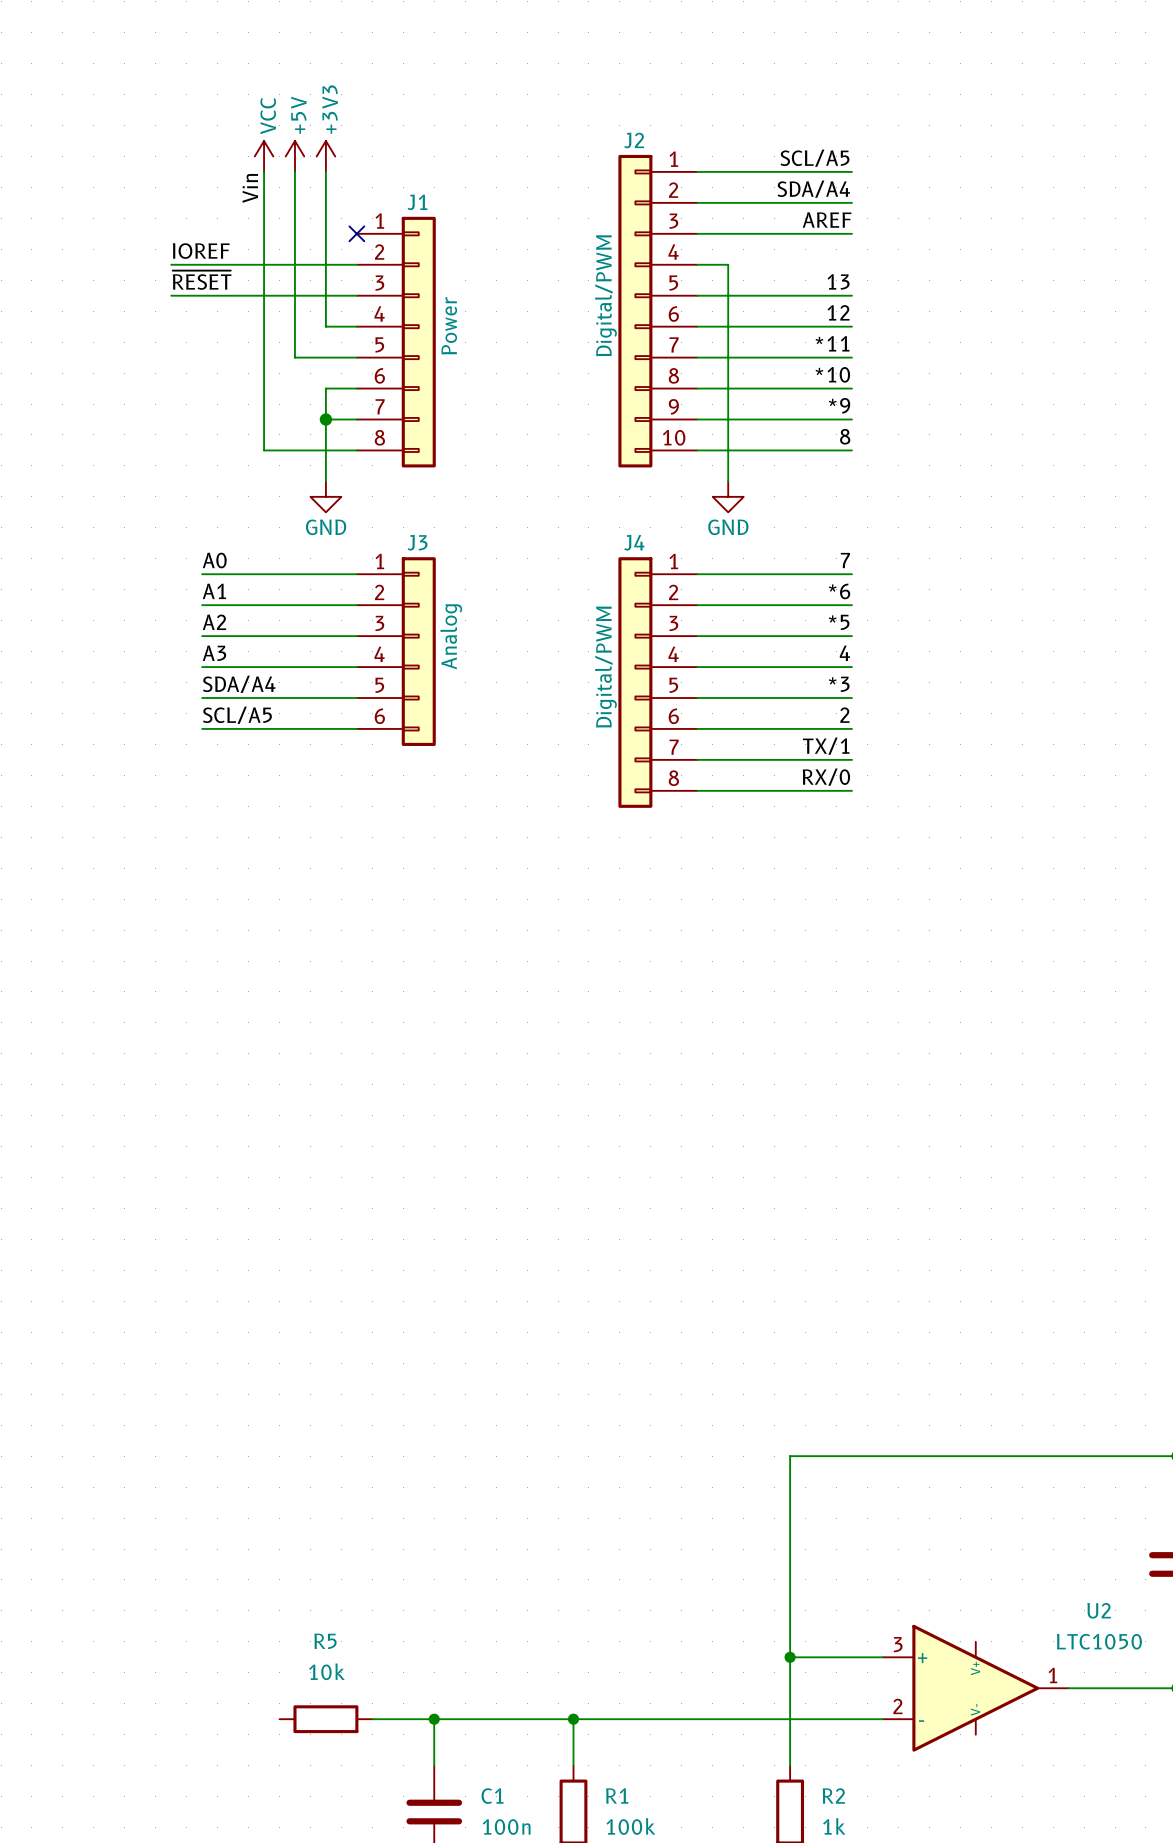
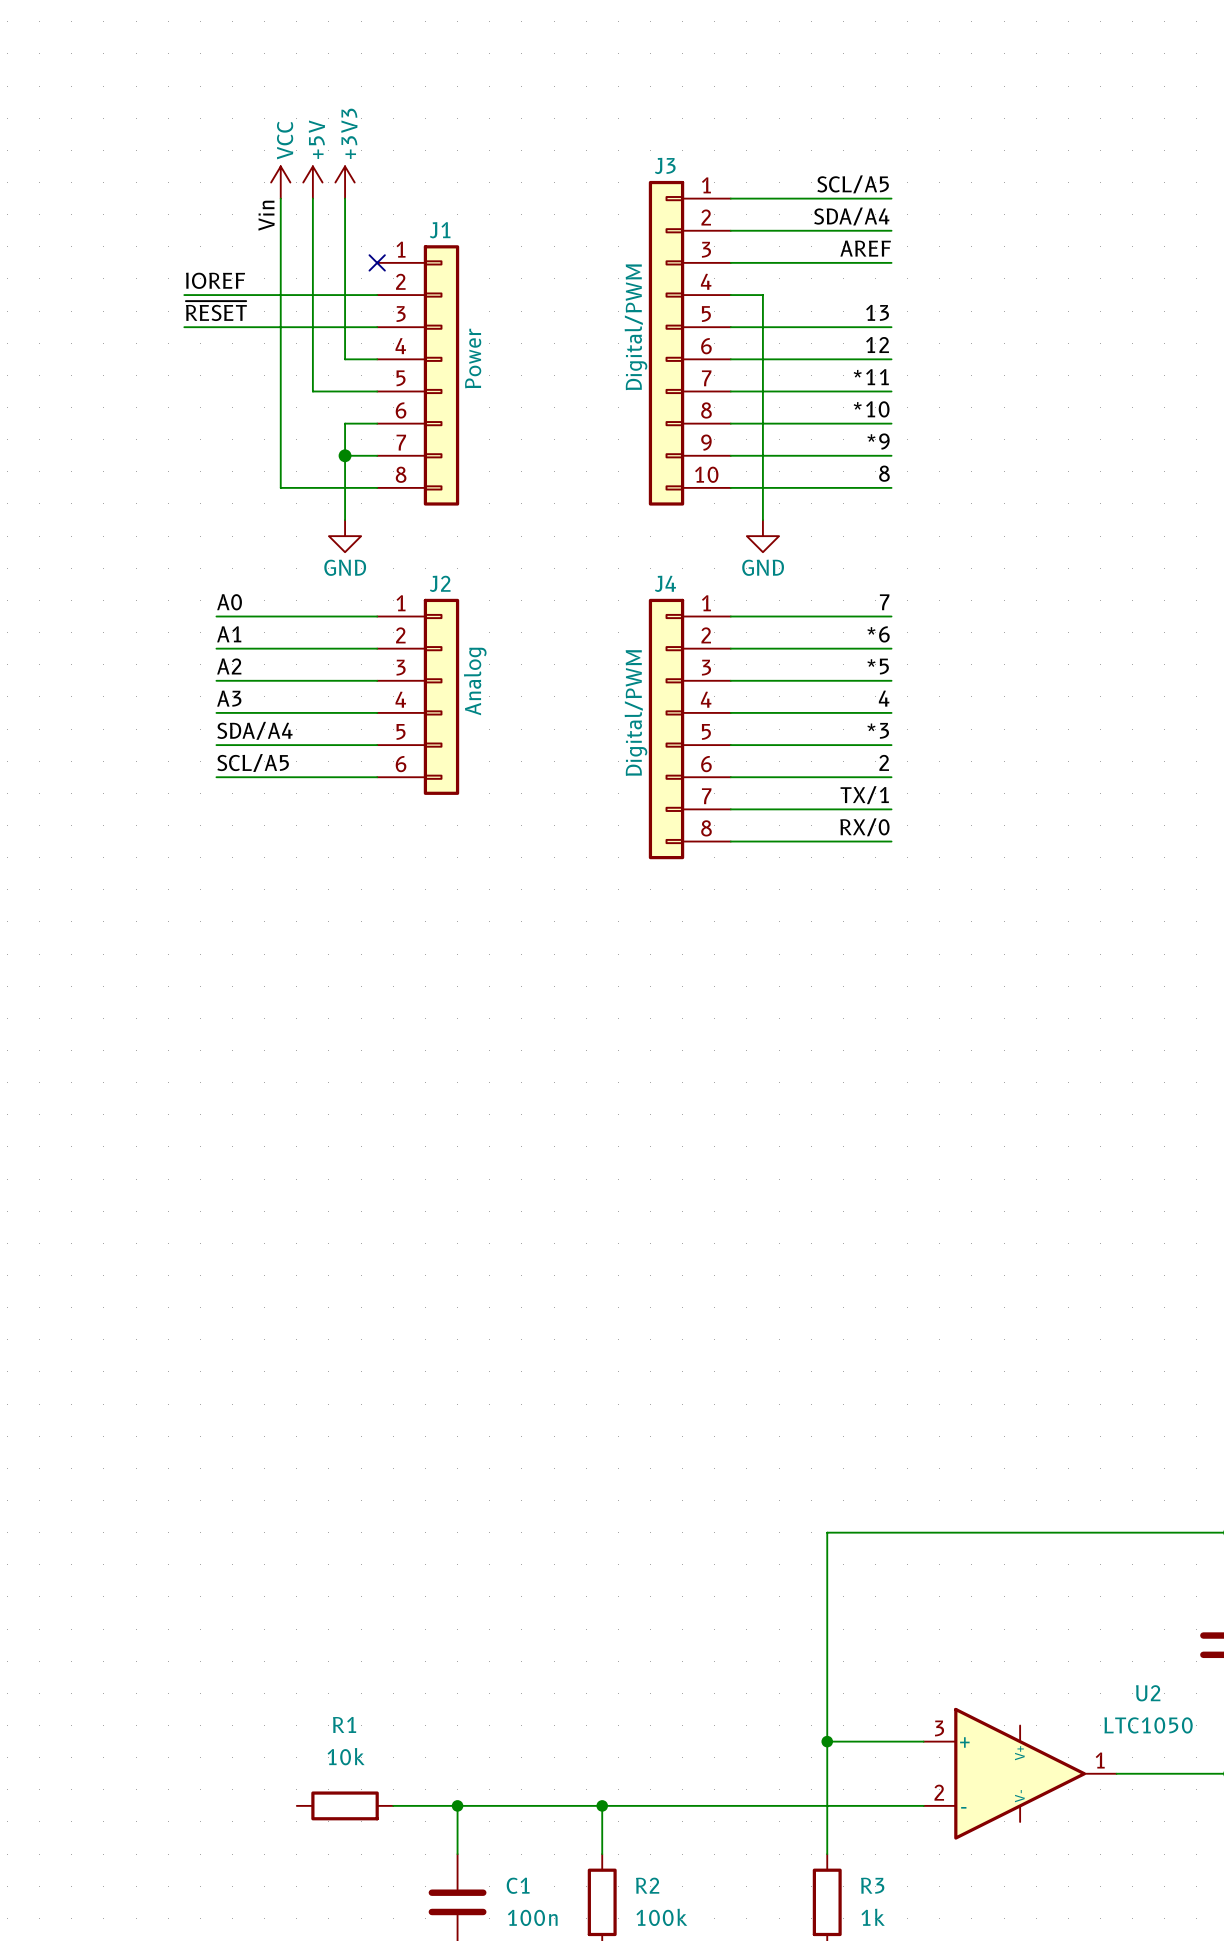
J2 name: J2 (634, 140) -> J3 (665, 165)
J3 name: J3 (417, 542) -> J2 (440, 583)
R5 name: R5 (325, 1641) -> R1 (344, 1724)
R1 name: R1 (617, 1795) -> R2 (647, 1885)
R2 name: R2 (833, 1796) -> R3 (872, 1885)

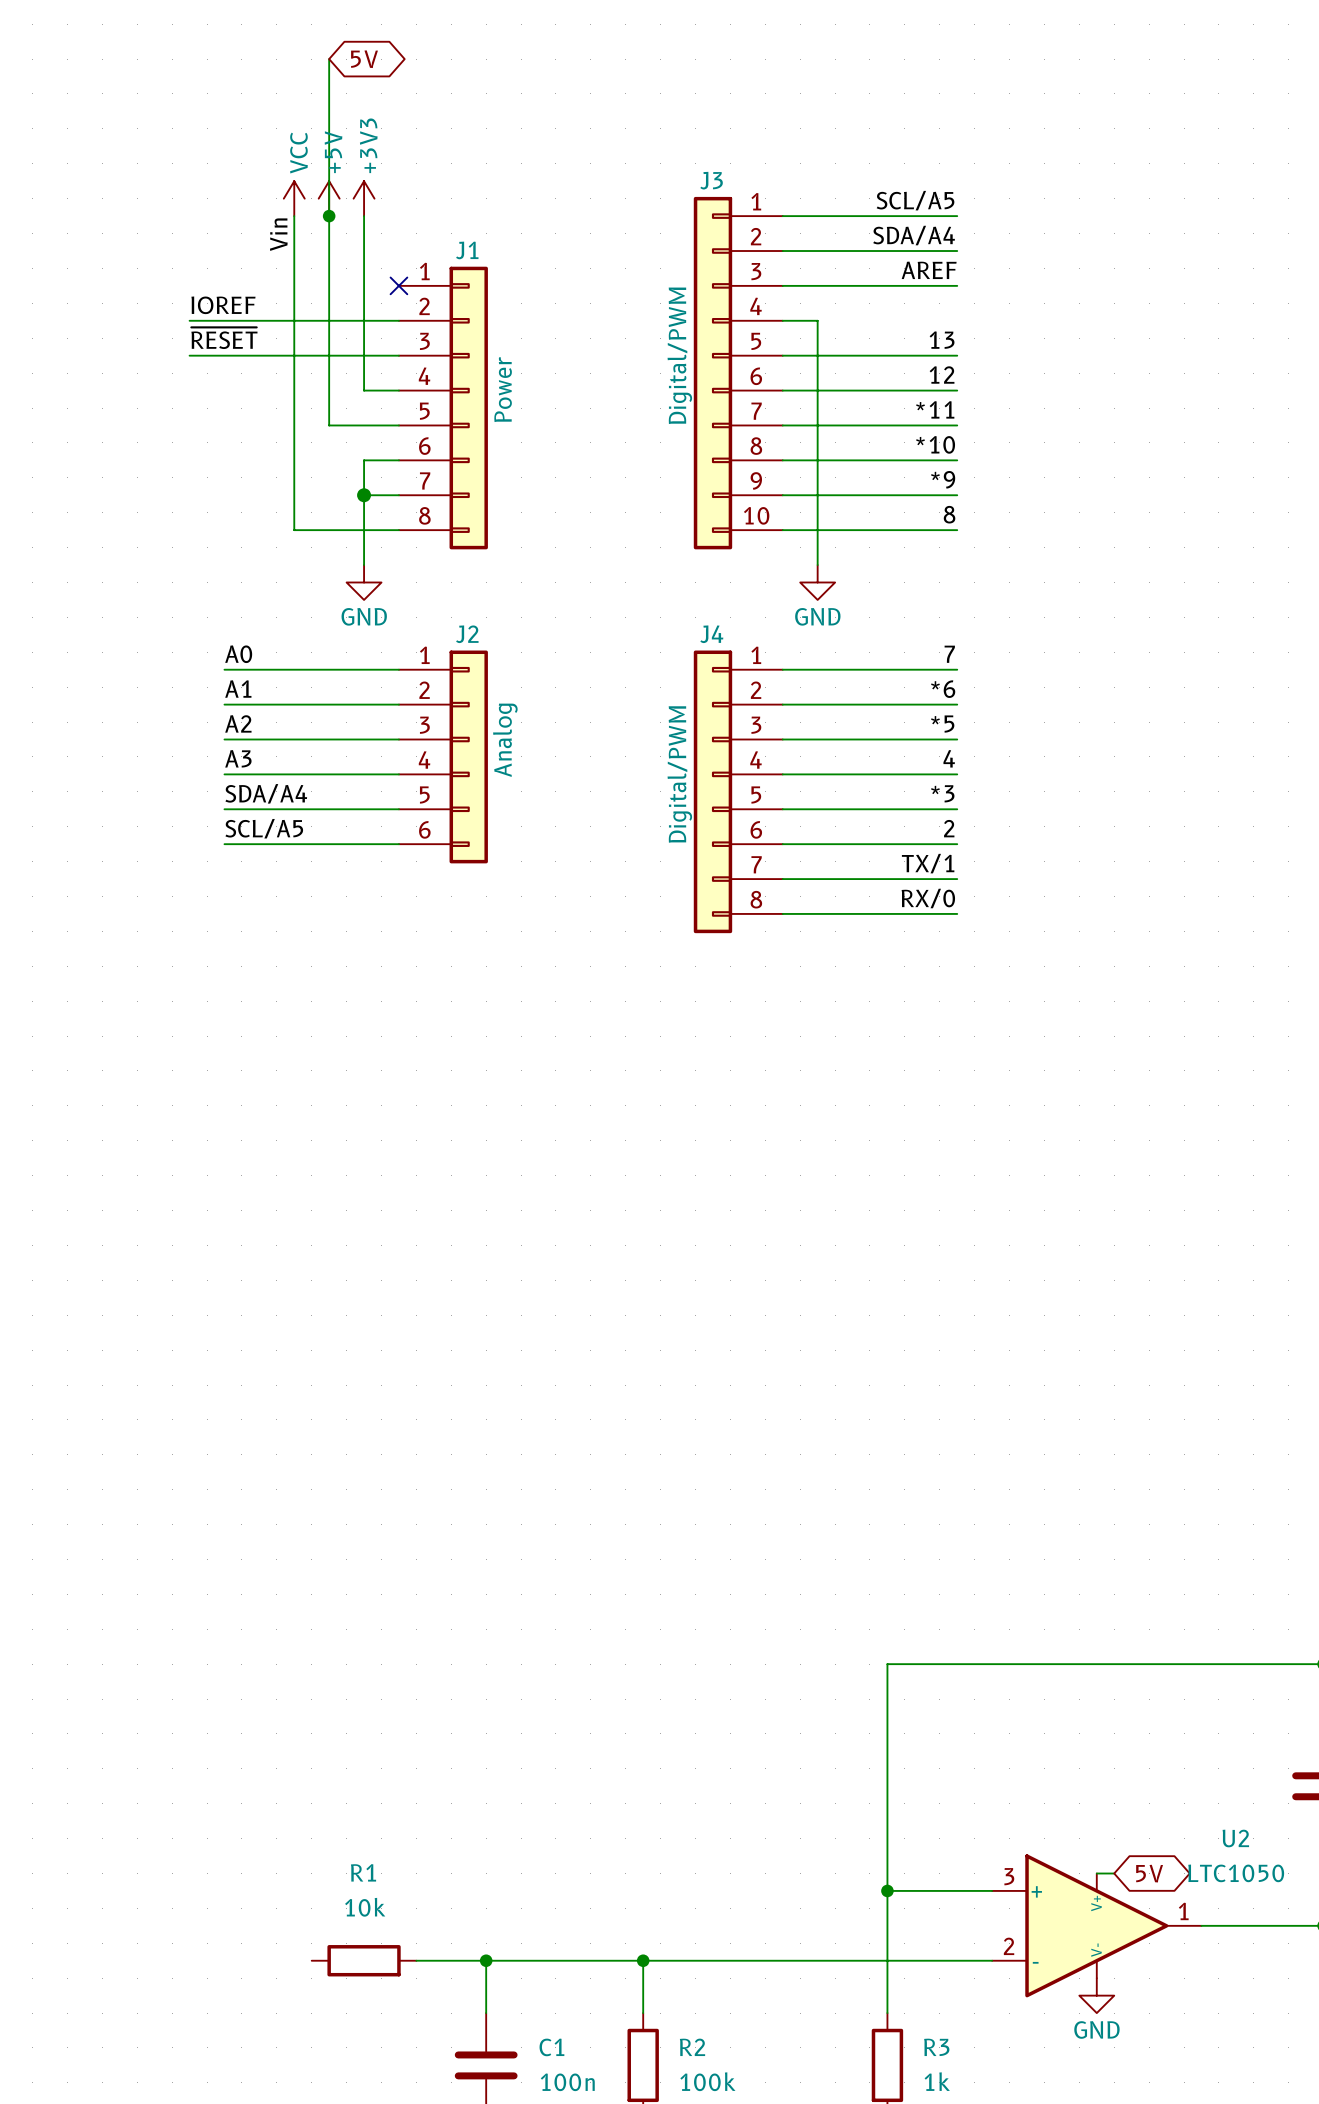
wire: none -> (329, 59) (329, 216)
global label: none -> 5V (364, 59)
junction: none -> (329, 216)
wire: none -> (1096, 1873) (1114, 1873)
global label: none -> 5V (1149, 1873)
power symbol: none -> GND (1096, 1995)

